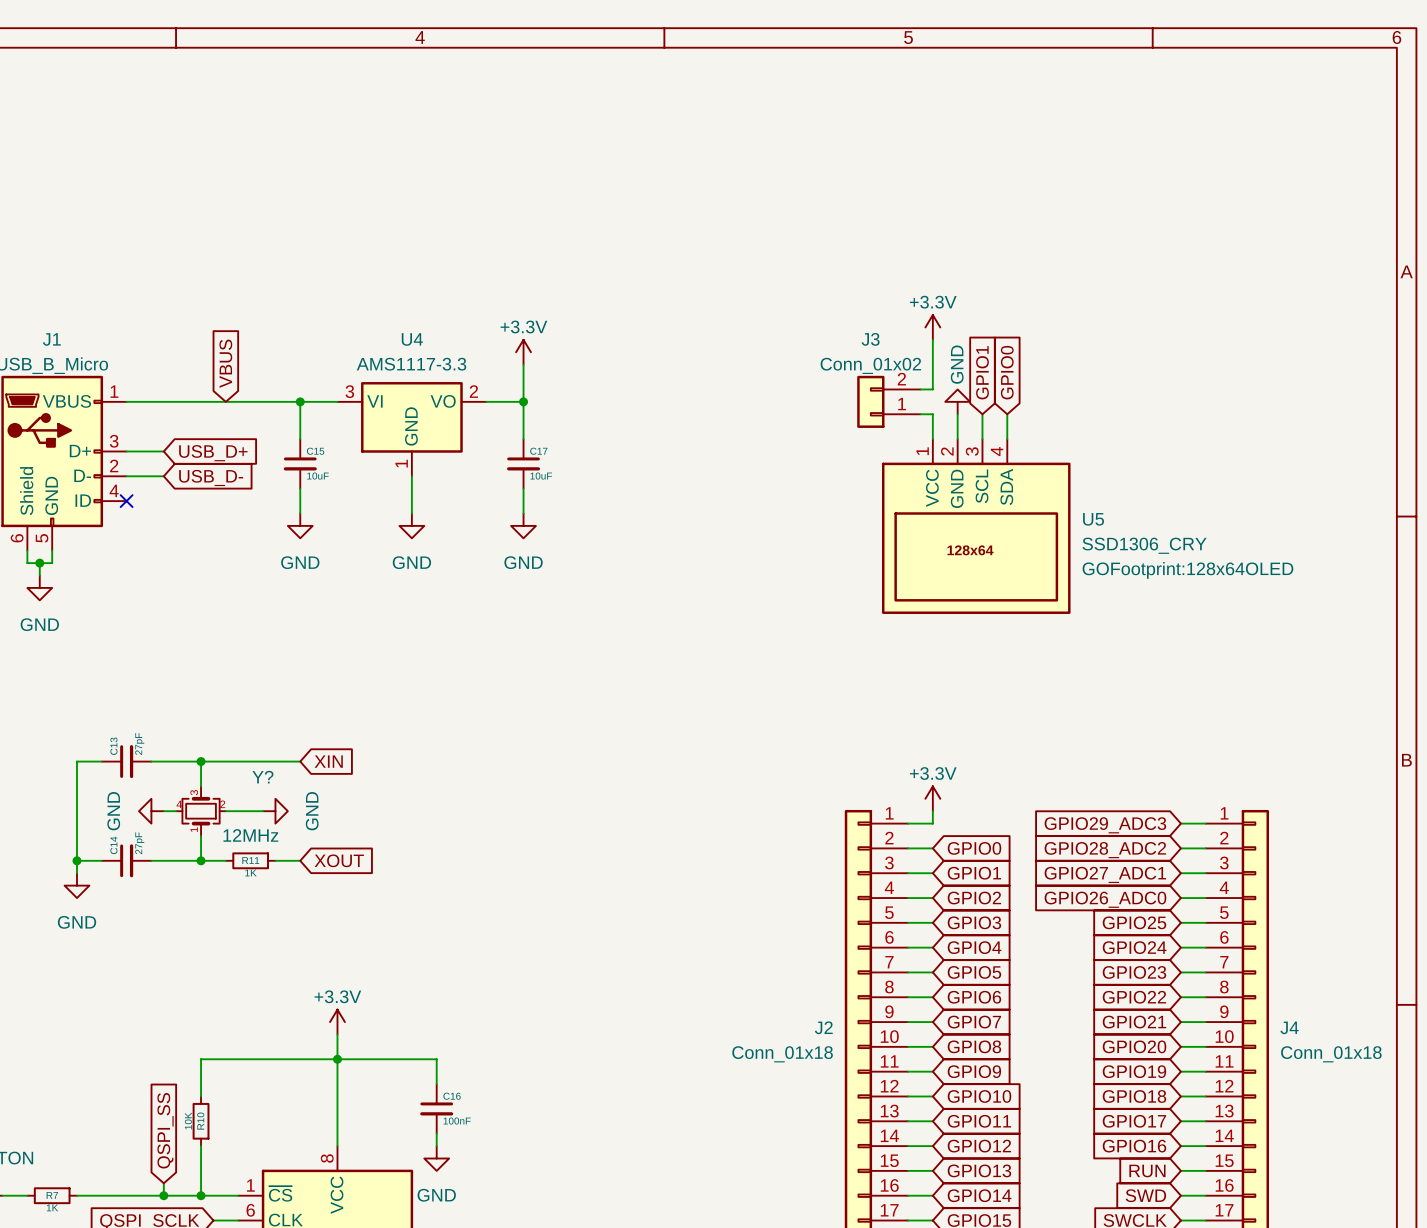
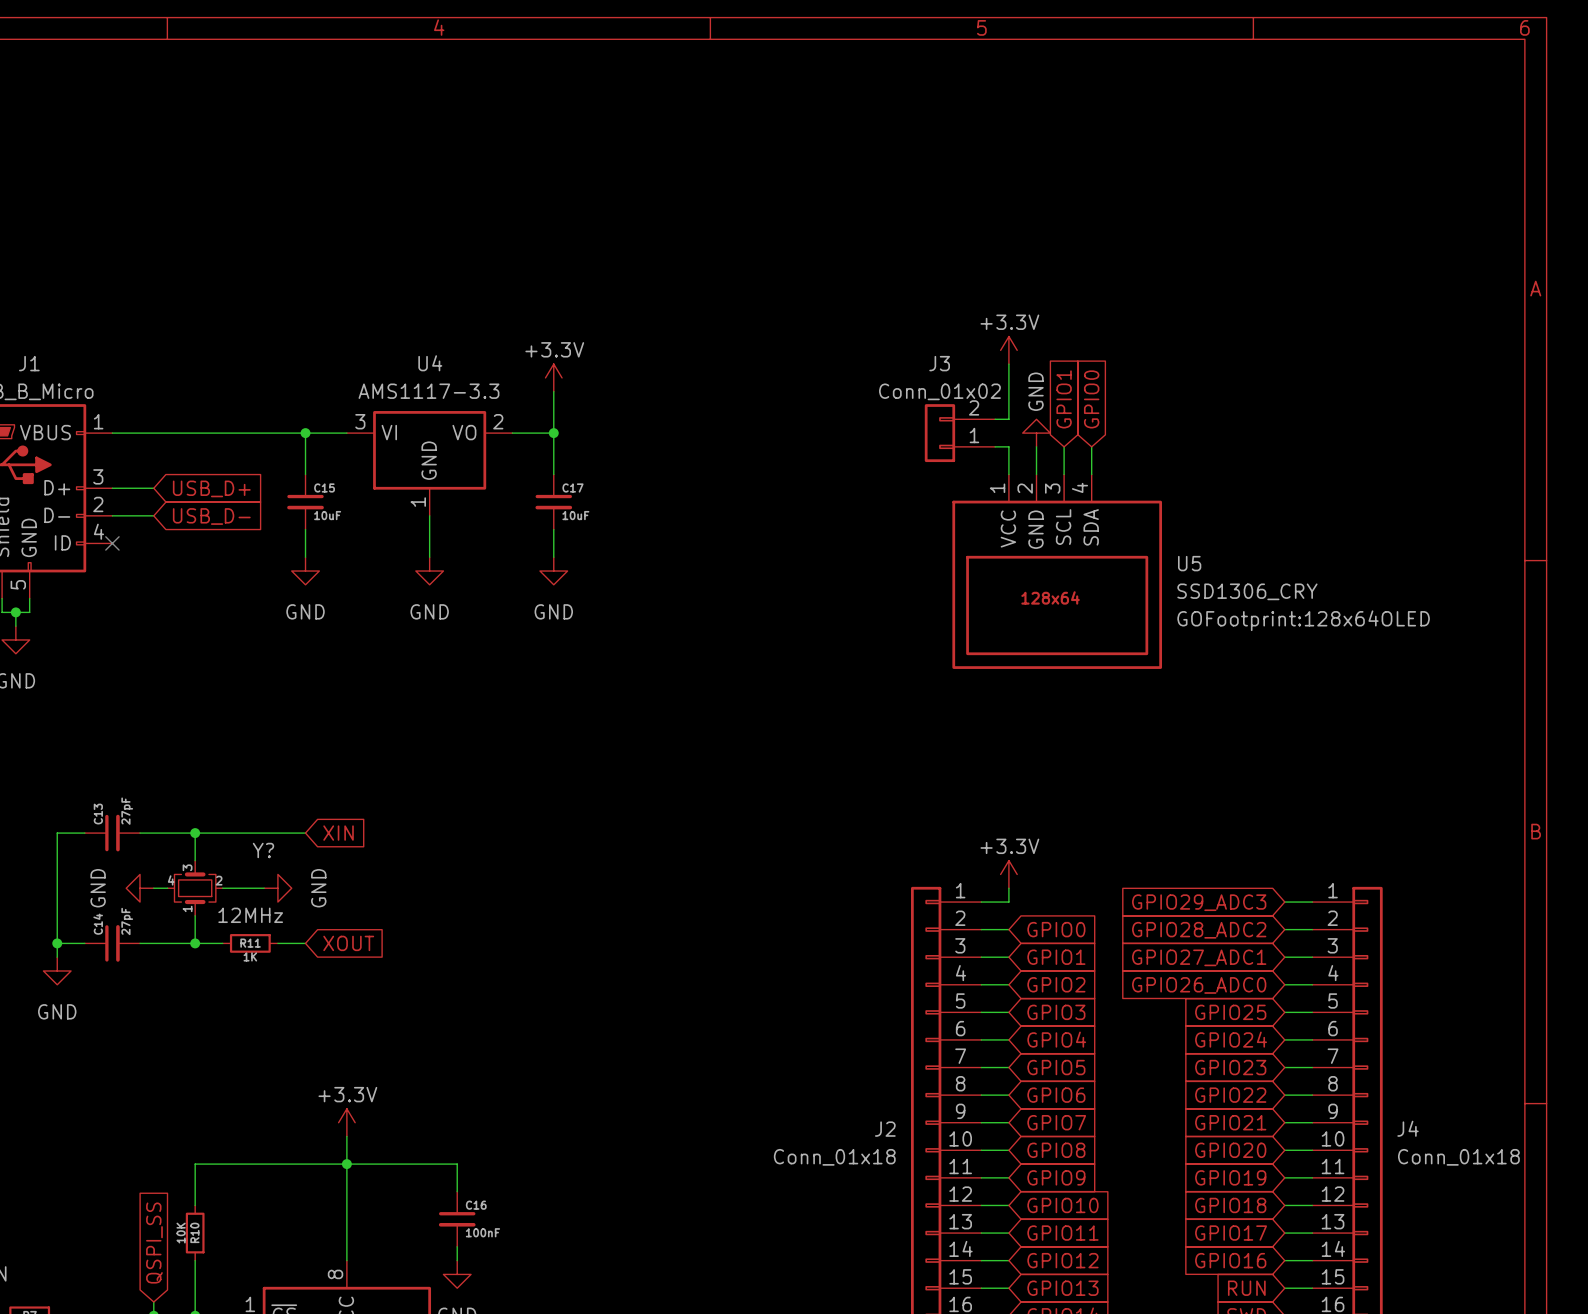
global label: VBUS (225, 363) -> none

